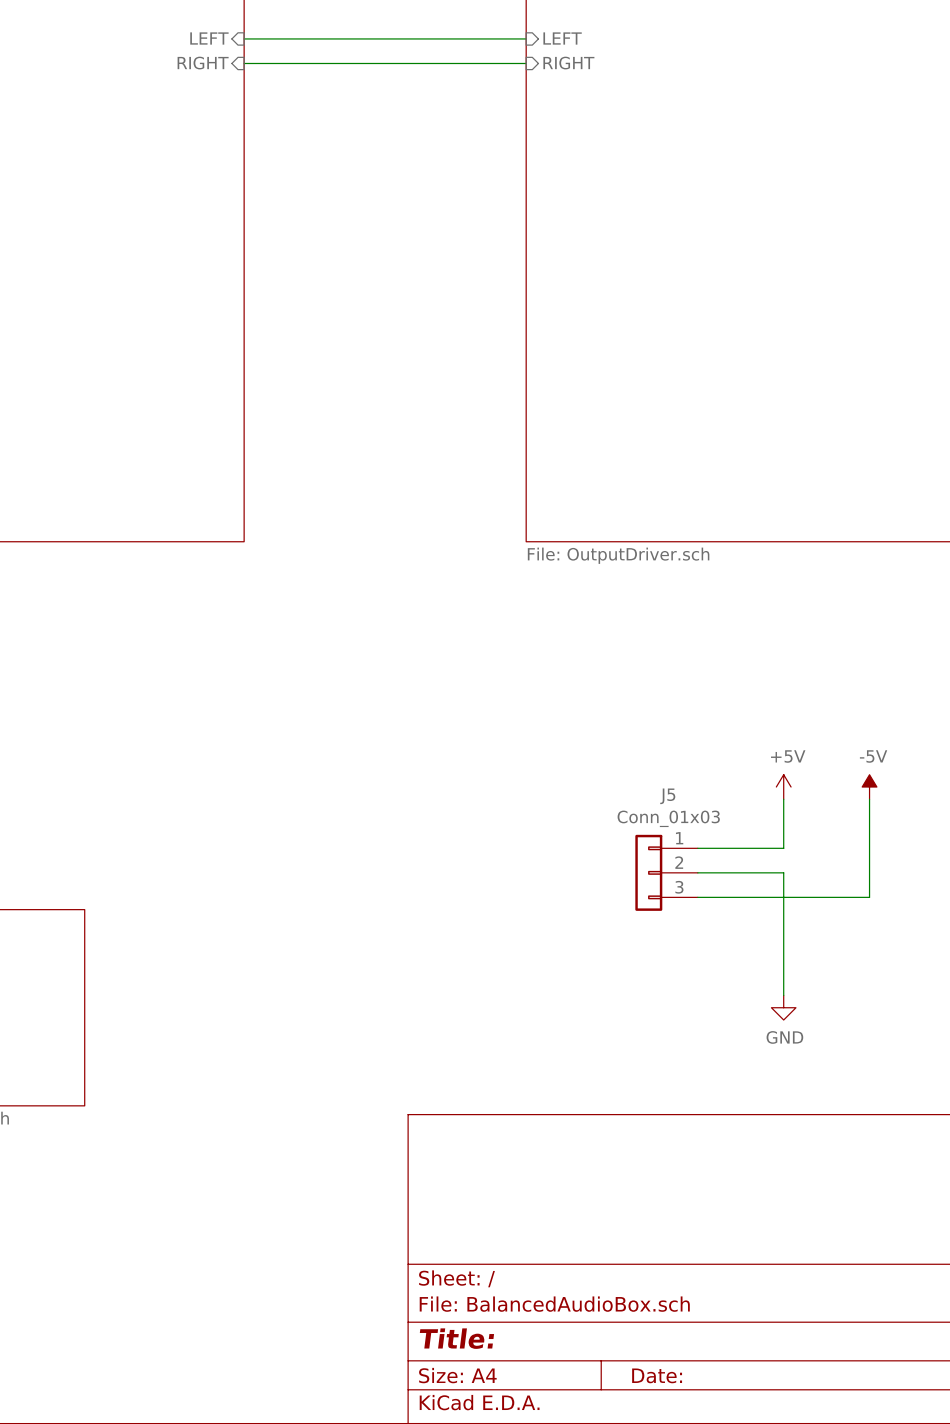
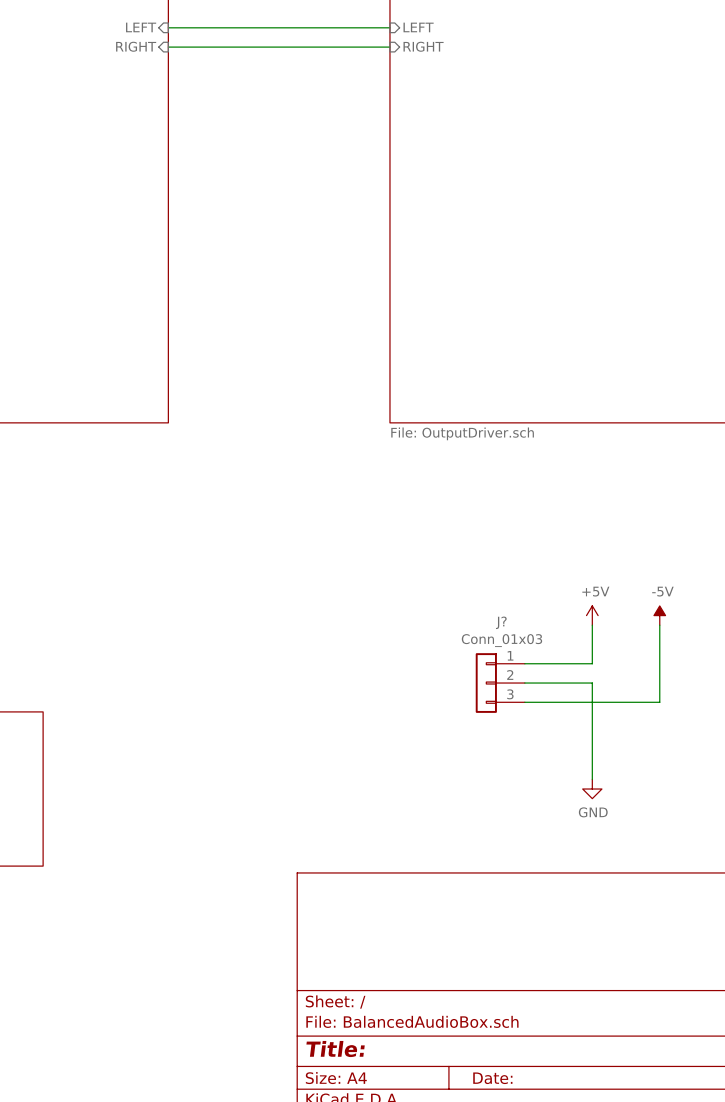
J5 name: J5 (667, 796) -> J? (501, 622)

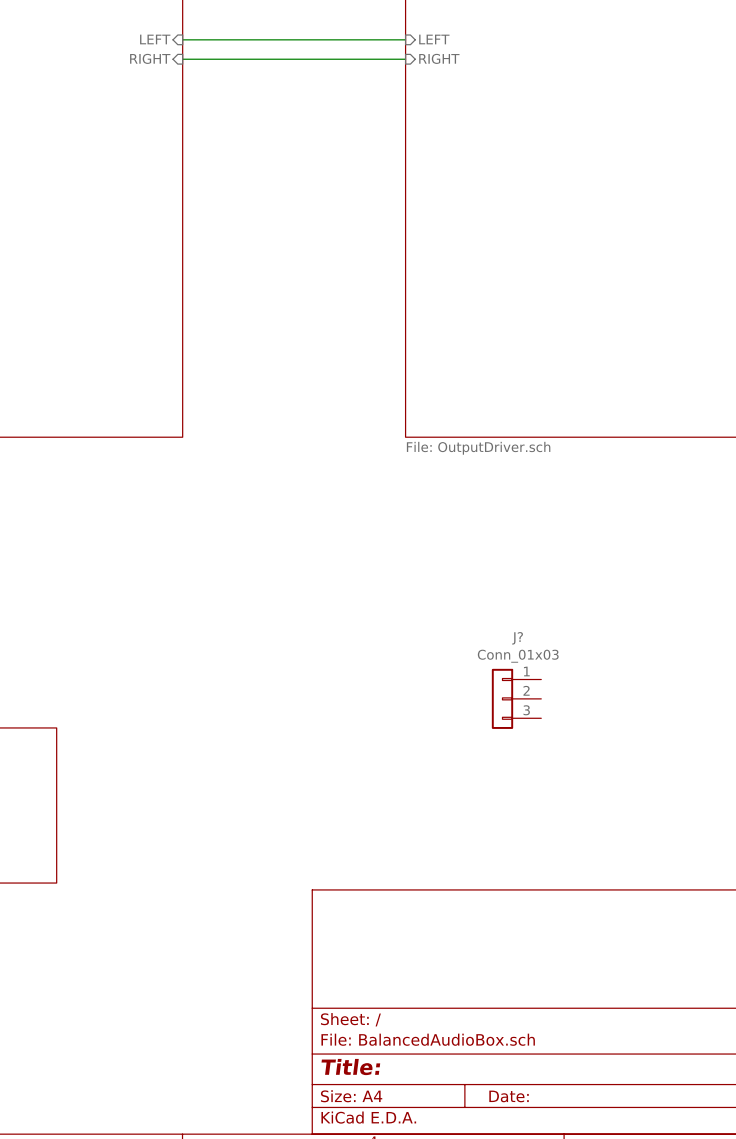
power symbol: +5V (592, 615) -> none
power symbol: -5V (659, 615) -> none
wire: (592, 625) (592, 663) (524, 663) -> none
wire: (659, 625) (659, 702) (524, 702) -> none
wire: (524, 683) (592, 683) (592, 779) -> none
power symbol: GND (592, 789) -> none

